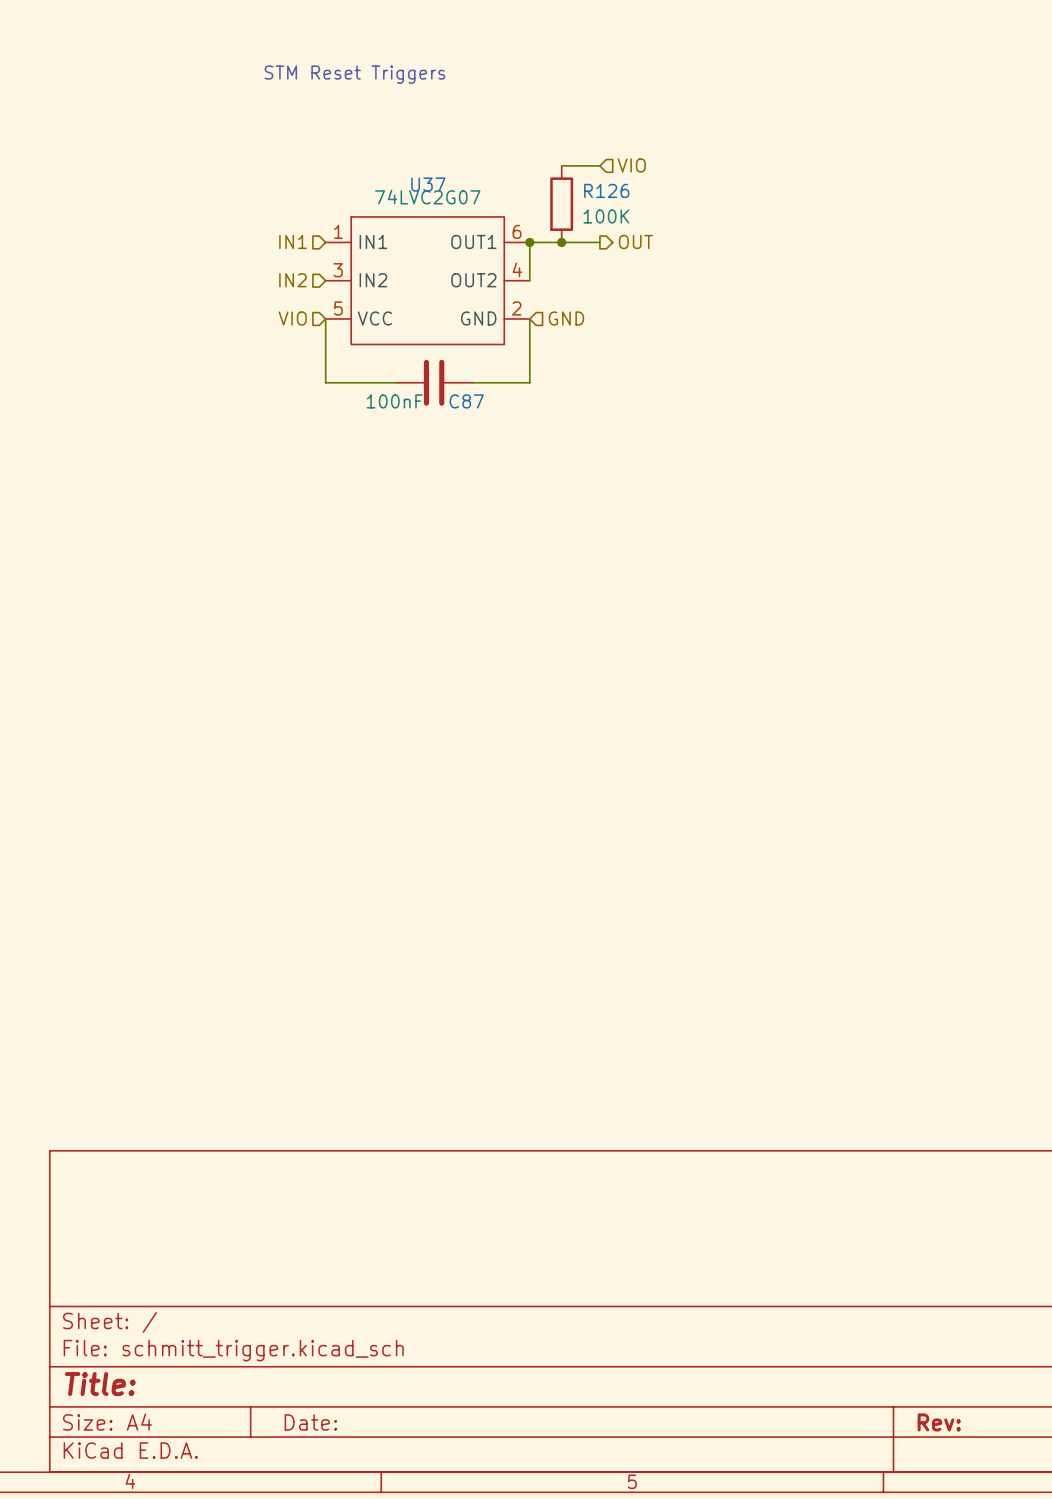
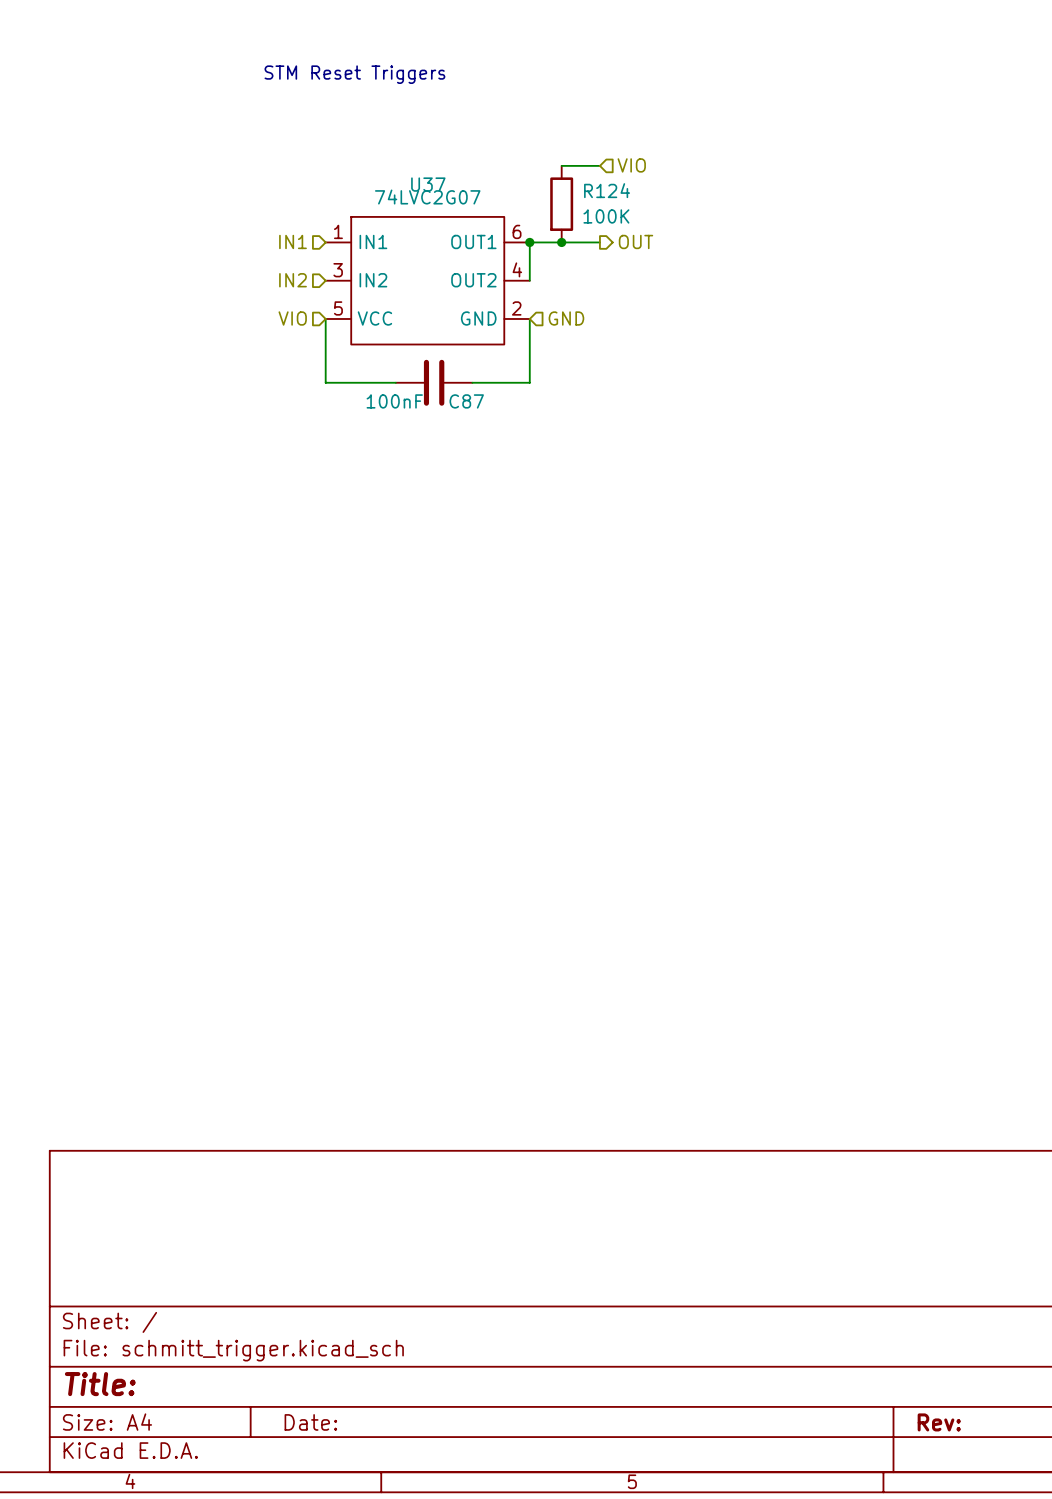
R126 name: R126 (606, 190) -> R124 (607, 190)

